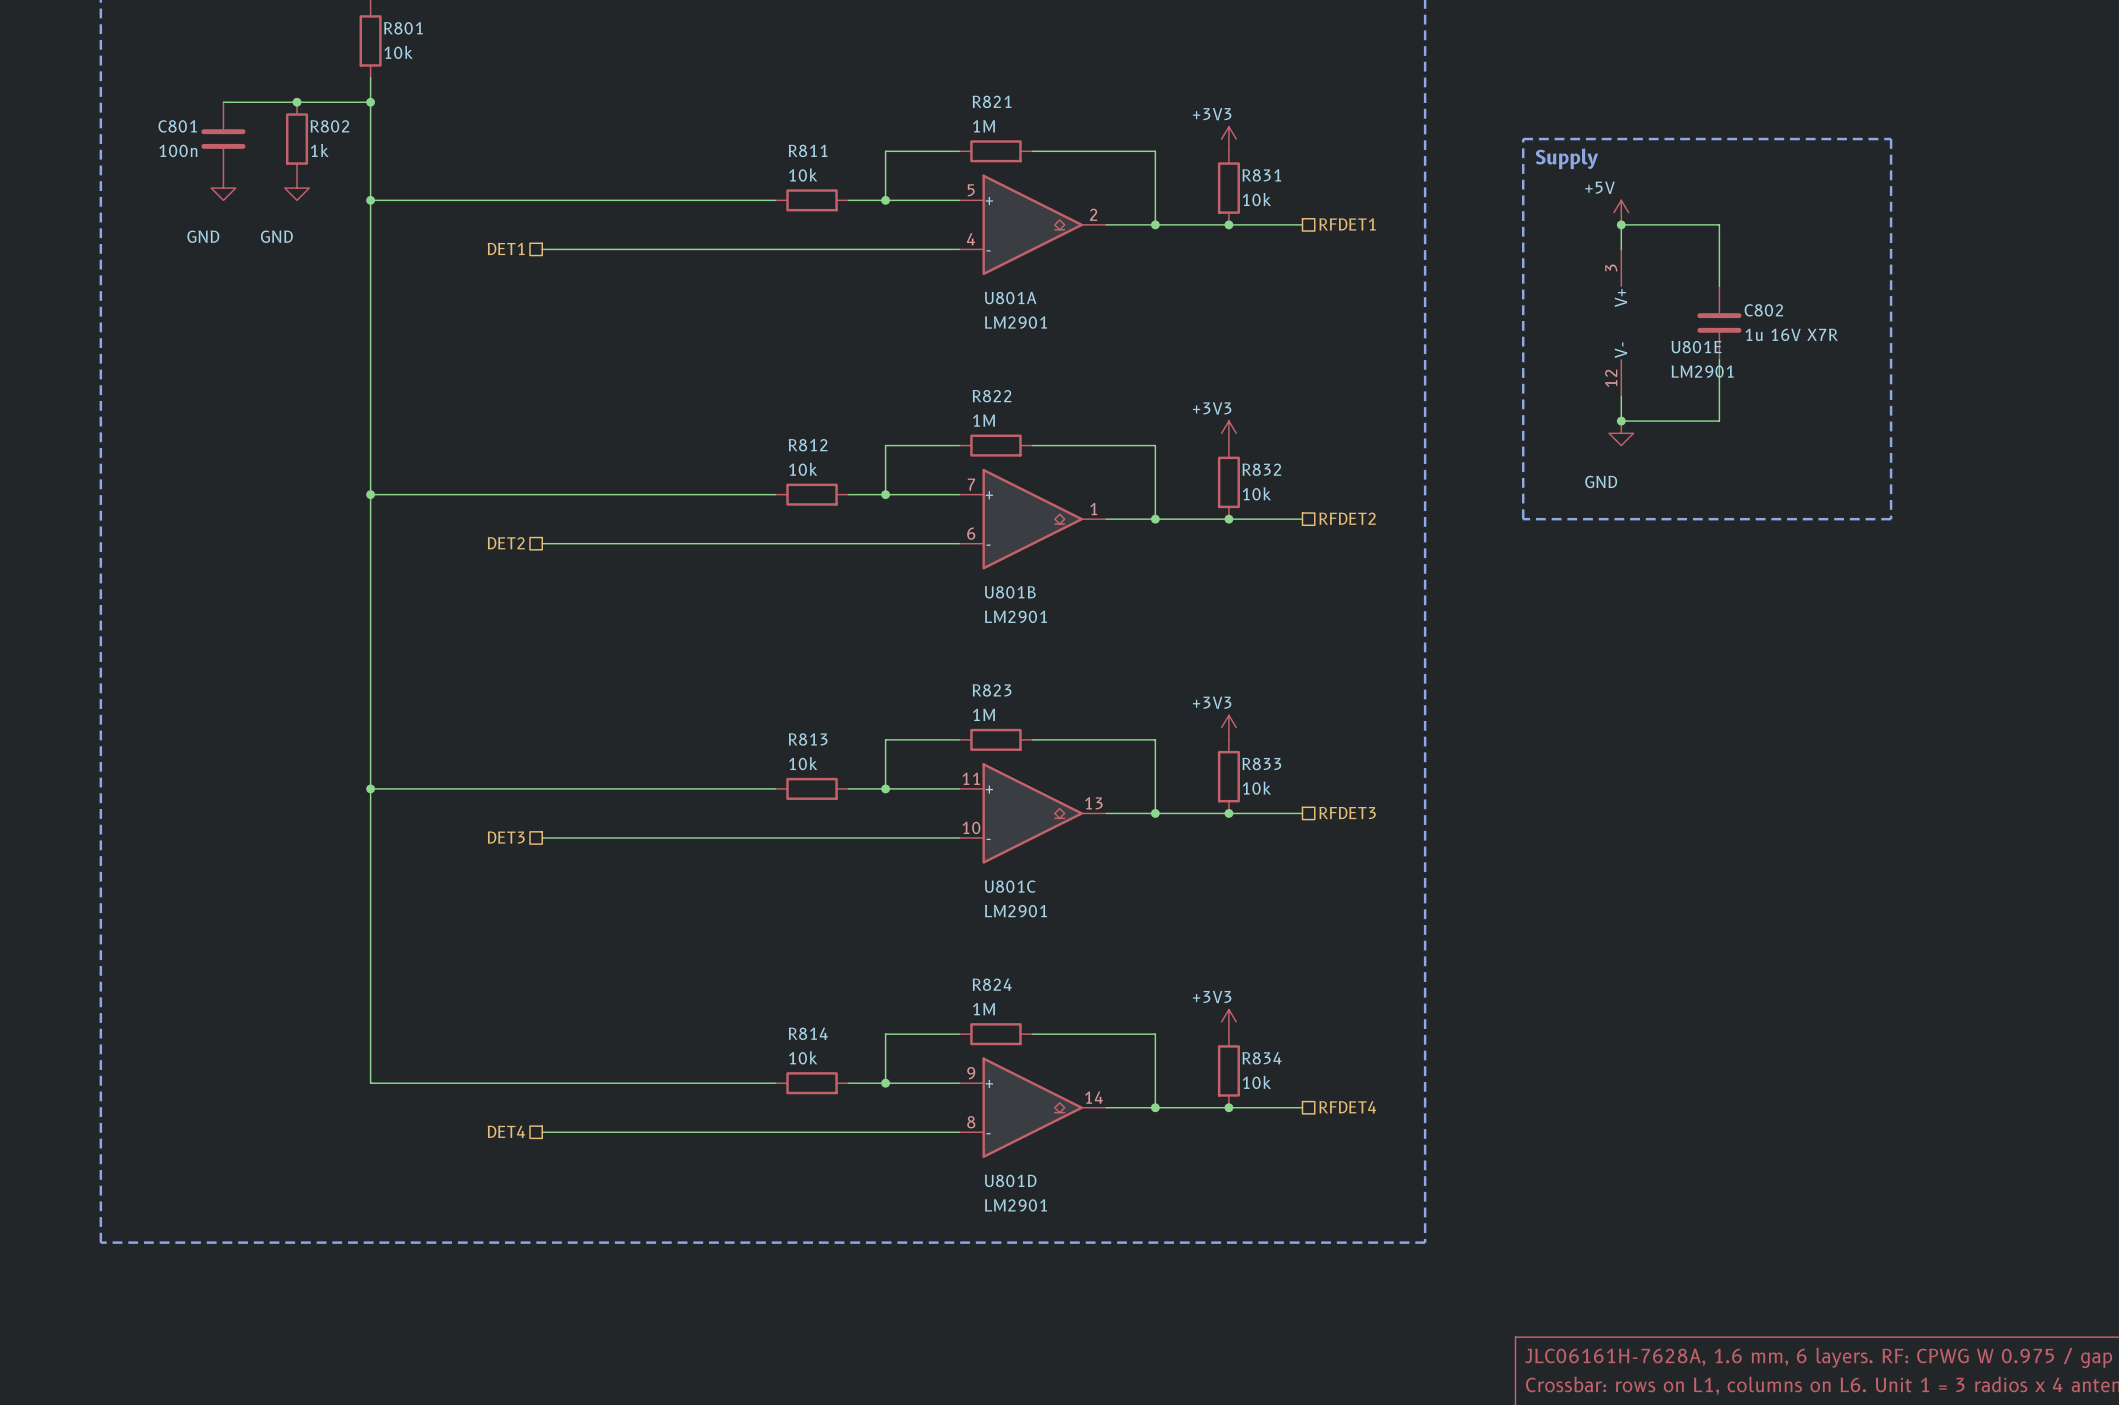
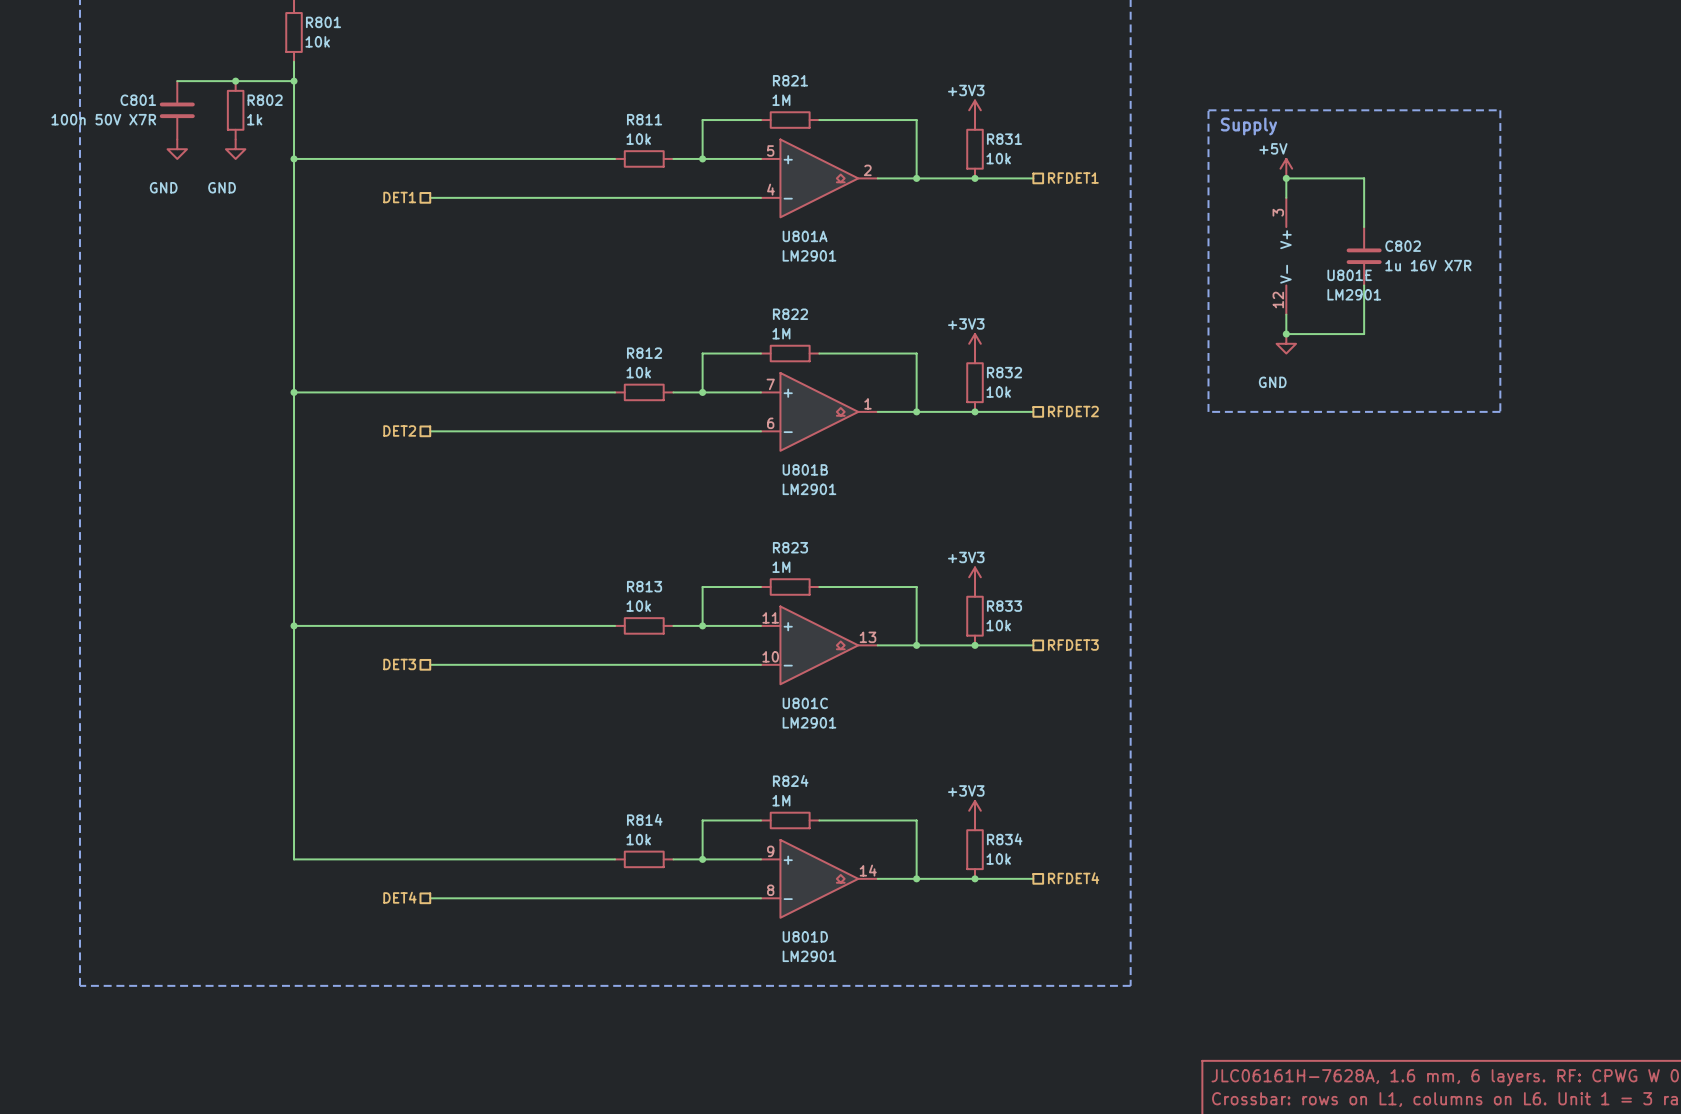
C801 value: 100n (178, 150) -> 100n 50V X7R (103, 119)

